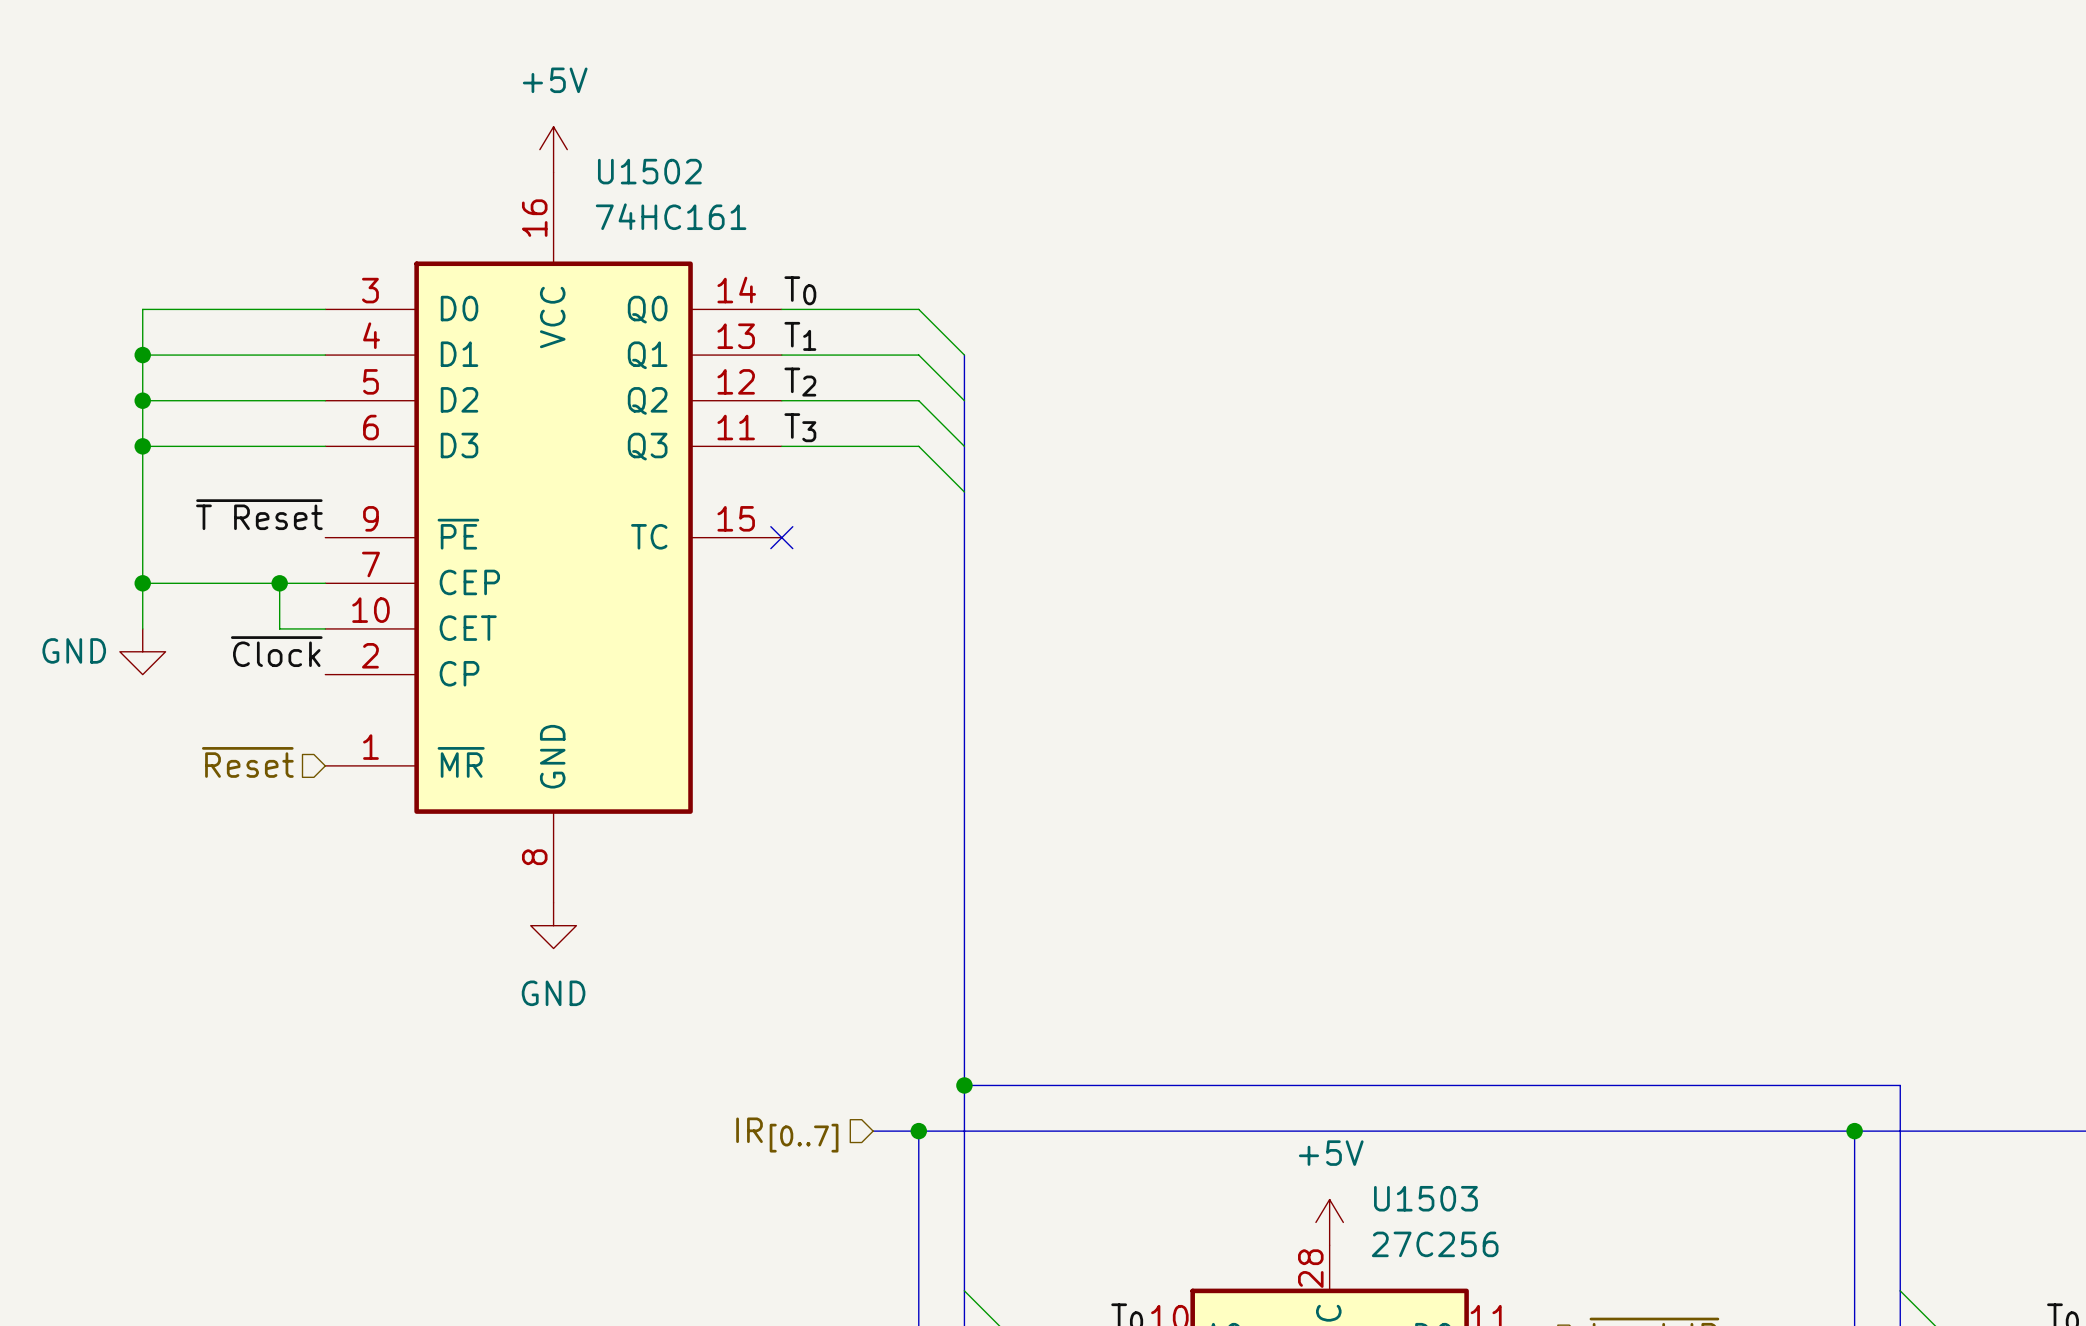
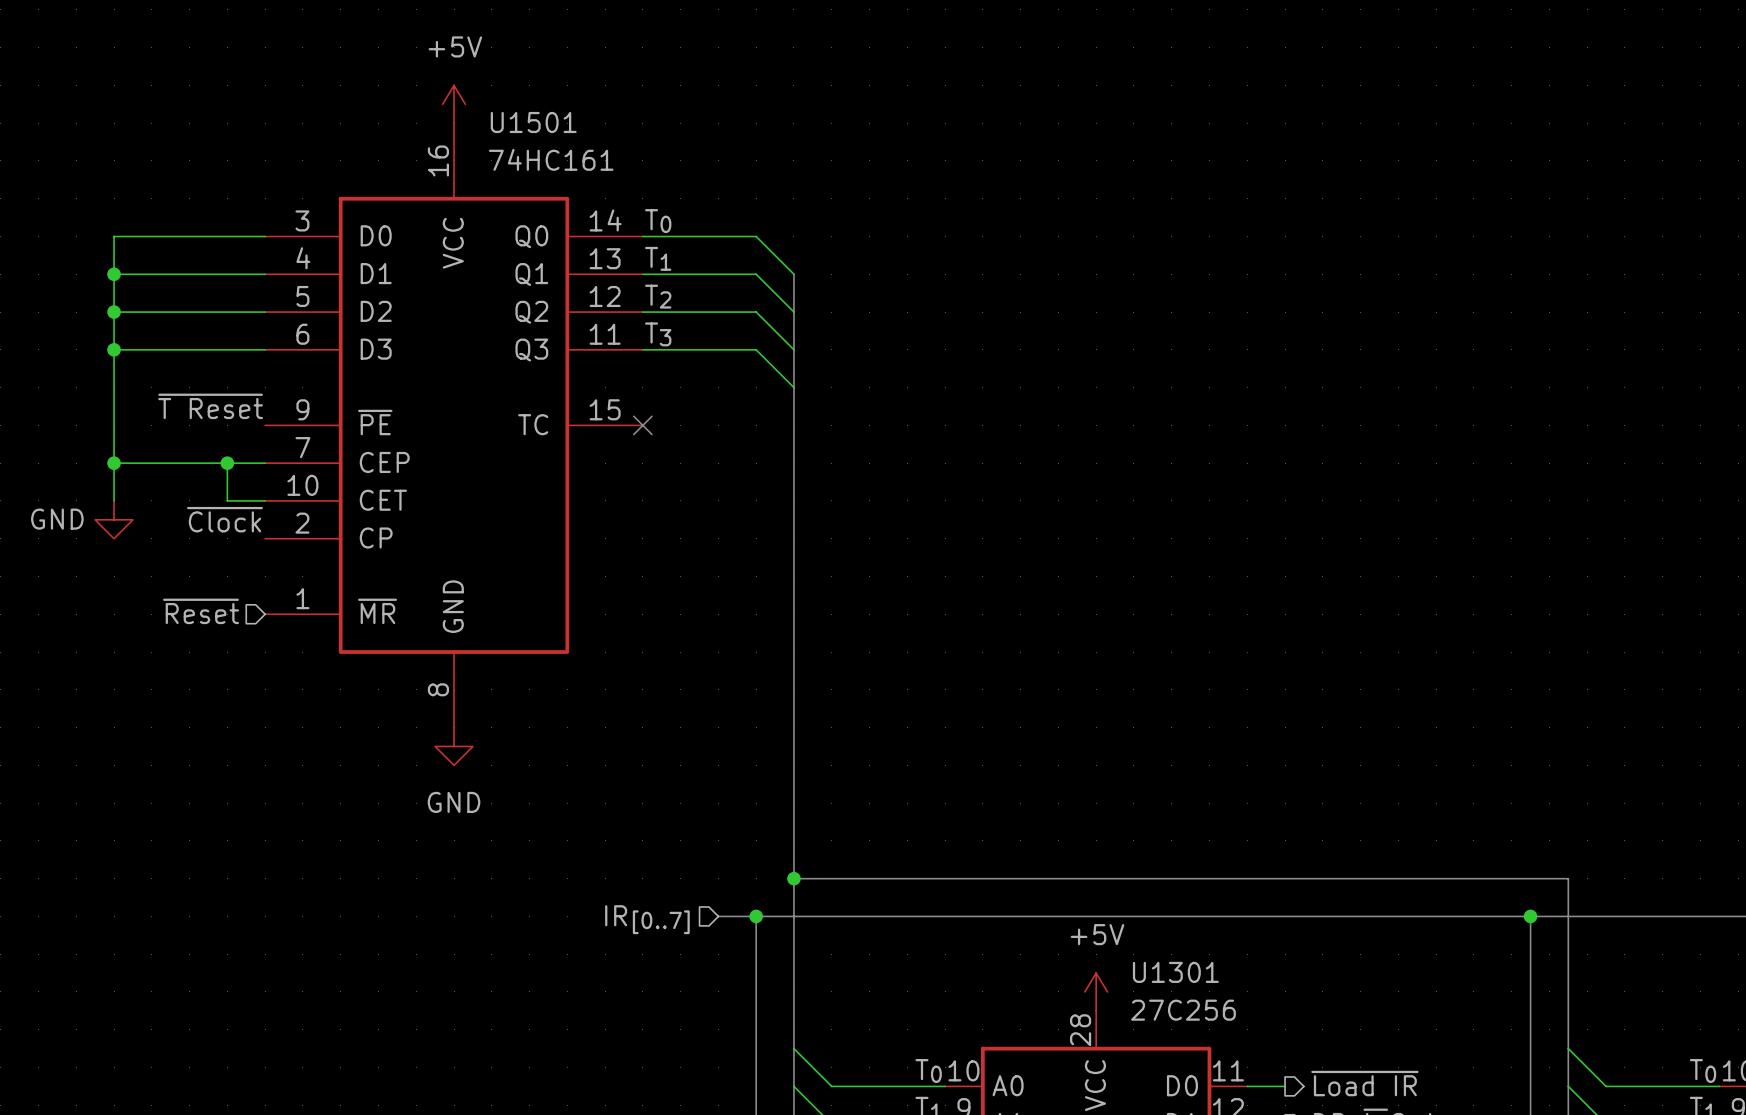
U1502 name: U1502 (649, 171) -> U1501 (533, 122)
U1503 name: U1503 (1425, 1198) -> U1301 (1175, 972)

